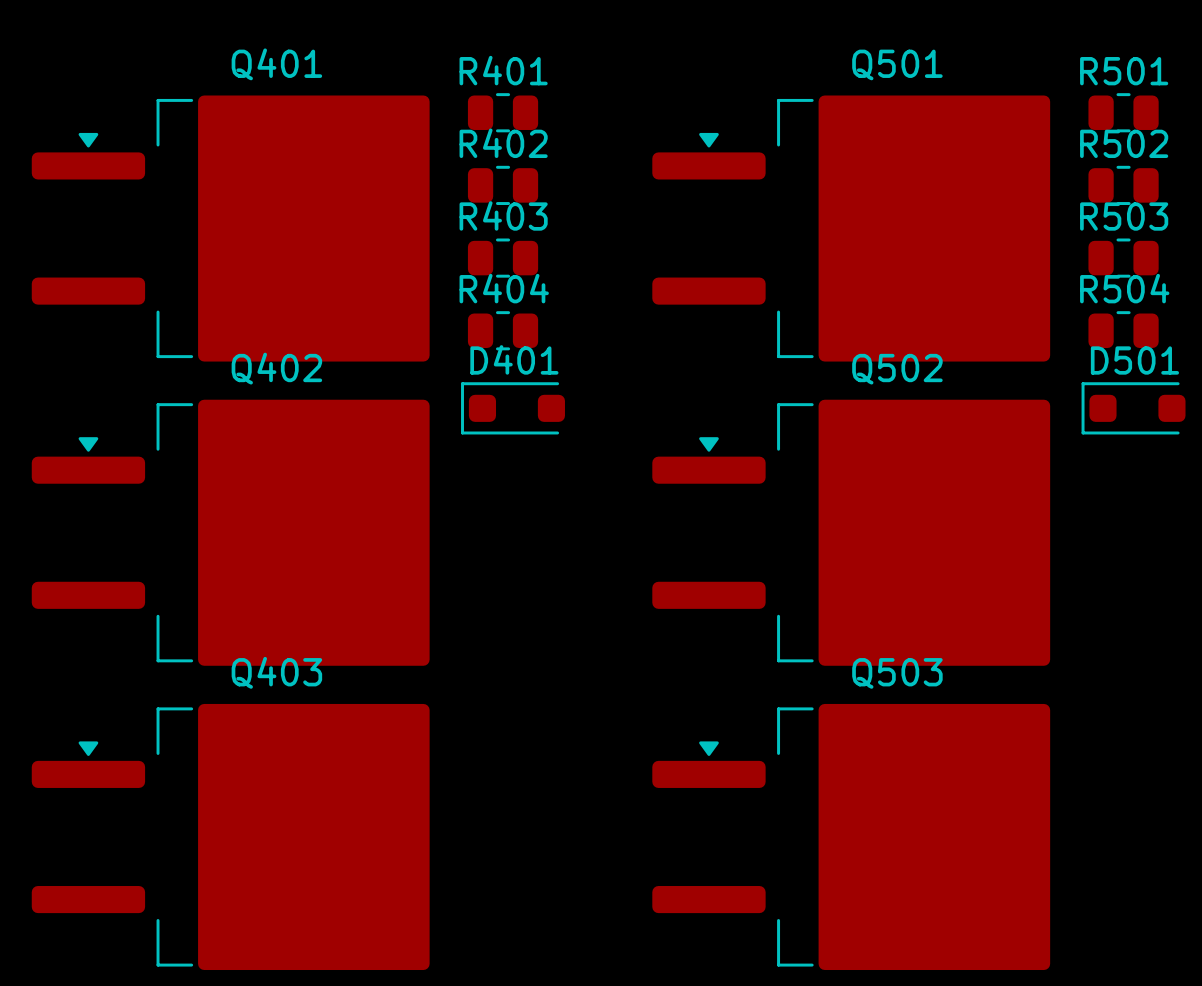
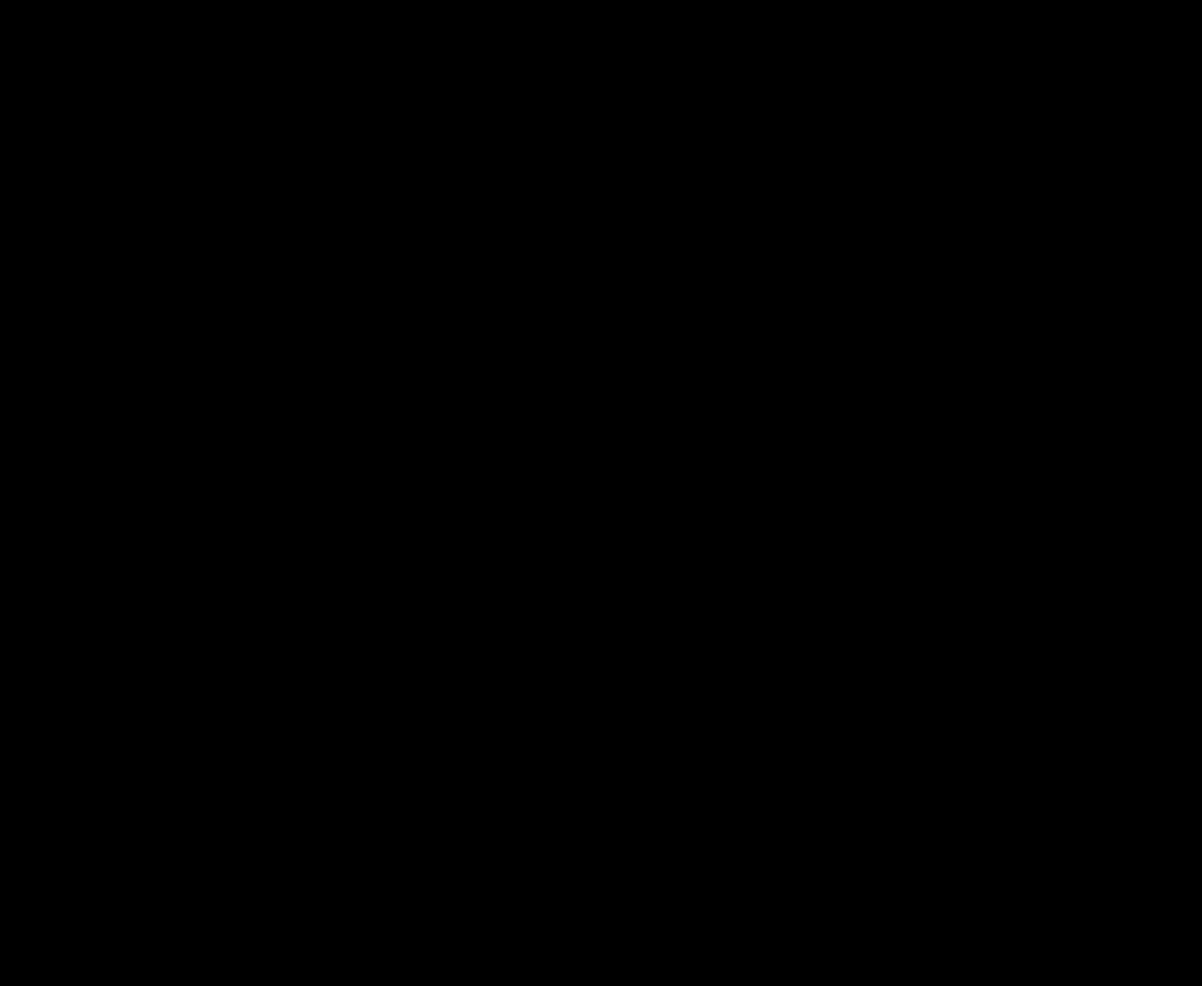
R401: (503, 112) -> none
R501: (1123, 112) -> none
R402: (503, 185) -> none
R502: (1123, 185) -> none
Q401: (230, 228) -> none
Q501: (851, 228) -> none
R403: (503, 258) -> none
R503: (1123, 258) -> none
R404: (503, 330) -> none
R504: (1123, 330) -> none
D401: (513, 408) -> none
D501: (1133, 408) -> none
Q402: (230, 532) -> none
Q502: (851, 532) -> none
Q403: (230, 836) -> none
Q503: (851, 836) -> none

